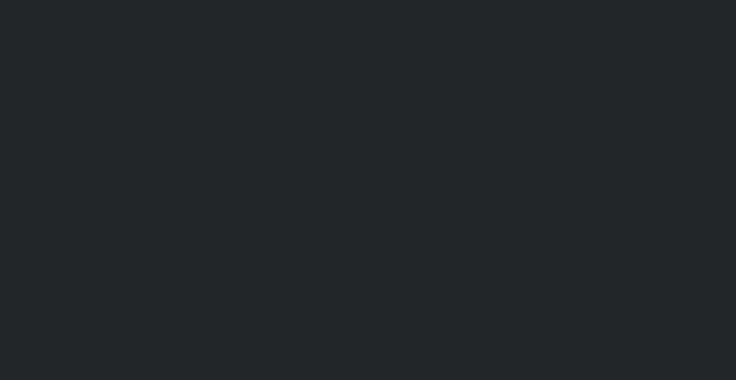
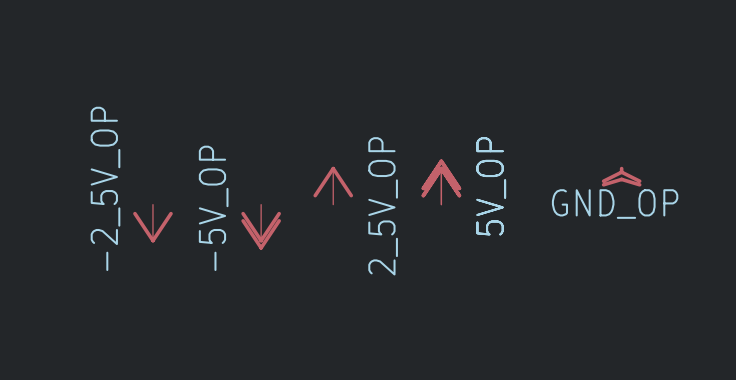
power symbol: none -> GND_OP (621, 176)
power symbol: none -> 5V_OP (441, 182)
power symbol: none -> 2_5V_OP (333, 185)
power symbol: none -> -2_5V_OP (152, 223)
power symbol: none -> -5V_OP (261, 227)

